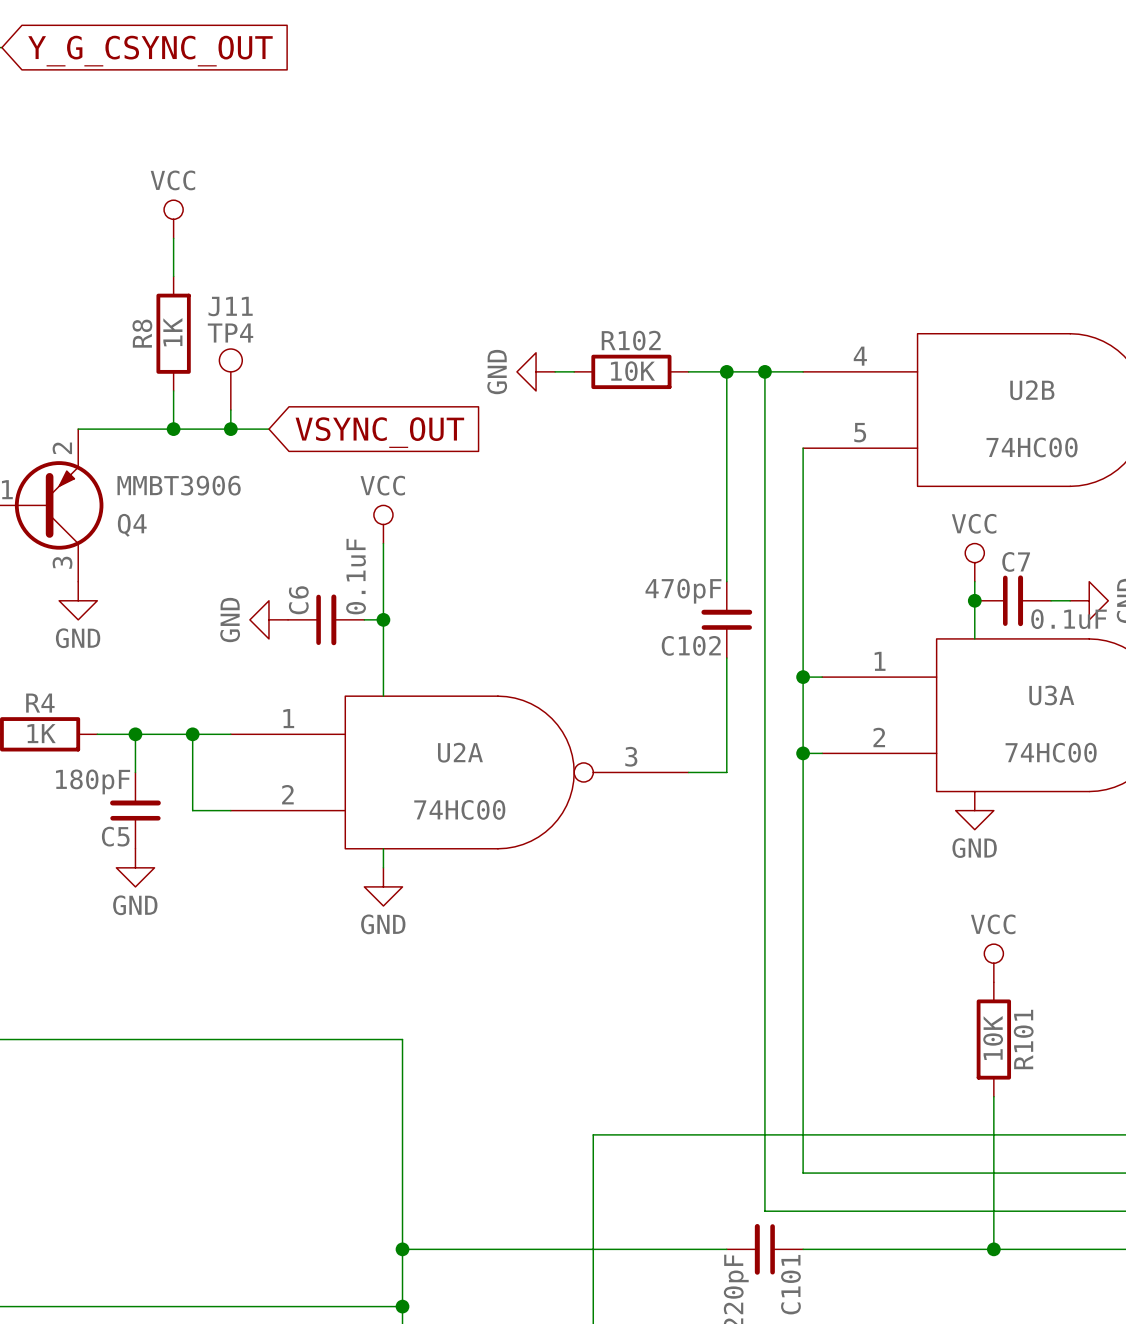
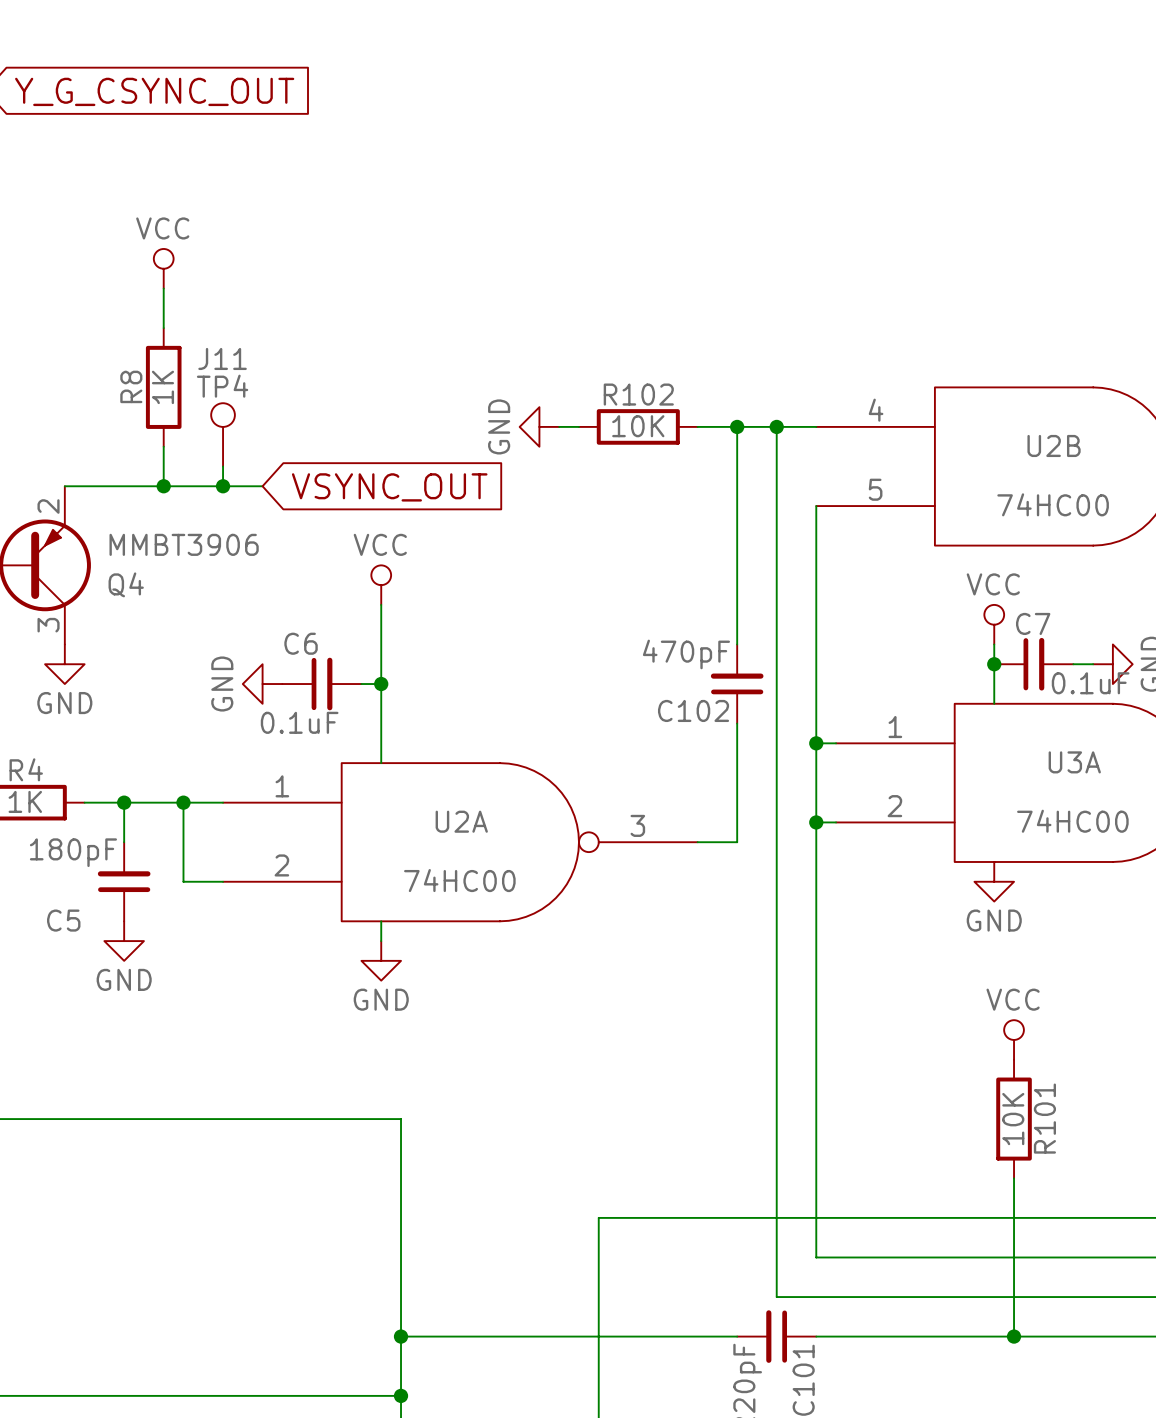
C6 value rotation: 0° (356, 576) -> 90° clockwise (299, 722)
C6 value position: 0.1uF (356, 576) -> 0.1uF (299, 722)
C6 name rotation: 0° (298, 600) -> 90° clockwise (301, 643)
C5 name position: C5 (115, 836) -> C5 (63, 920)

